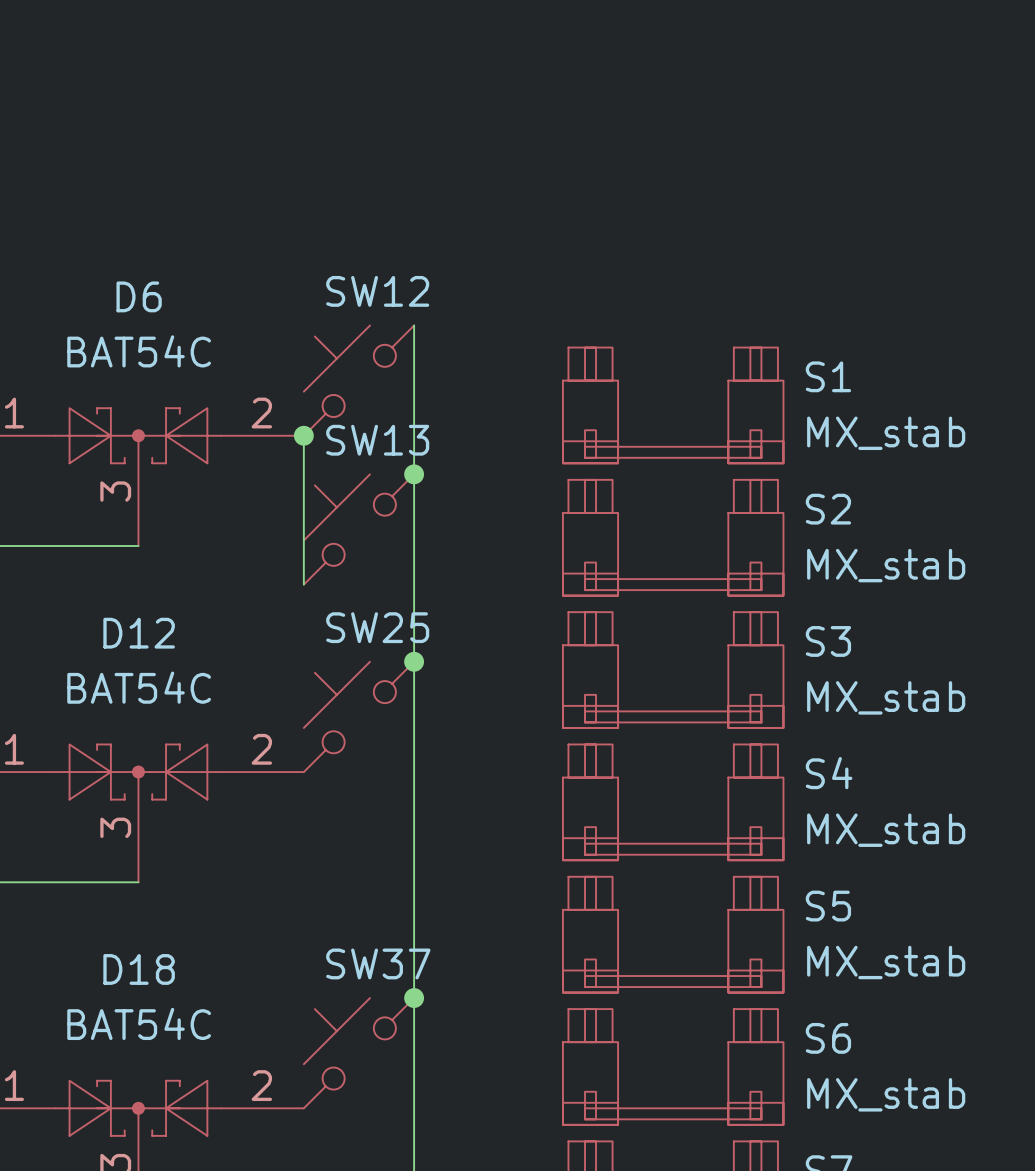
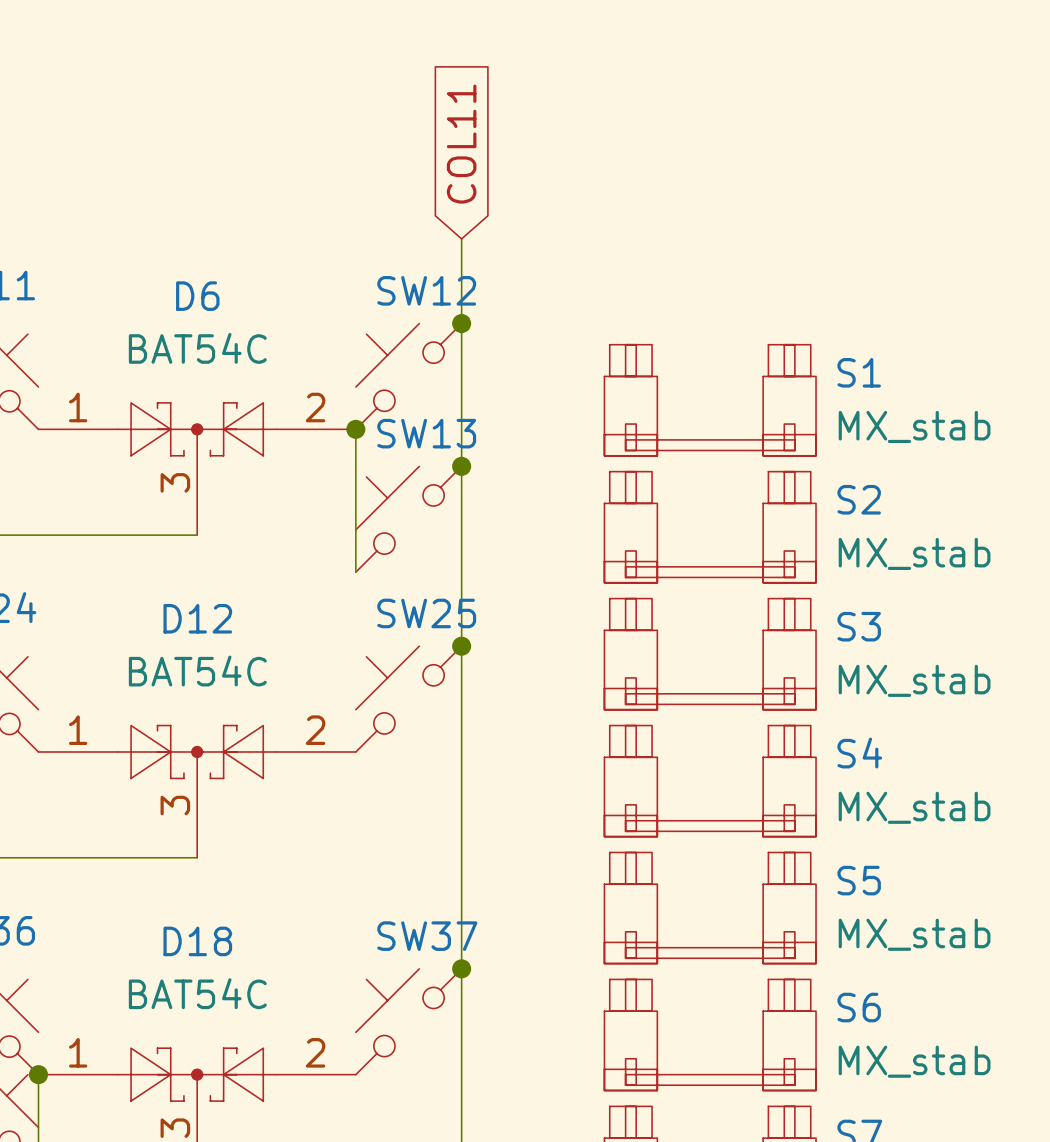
global label: none -> COL11 (461, 144)
wire: none -> (461, 238) (461, 323)
junction: none -> (461, 323)

